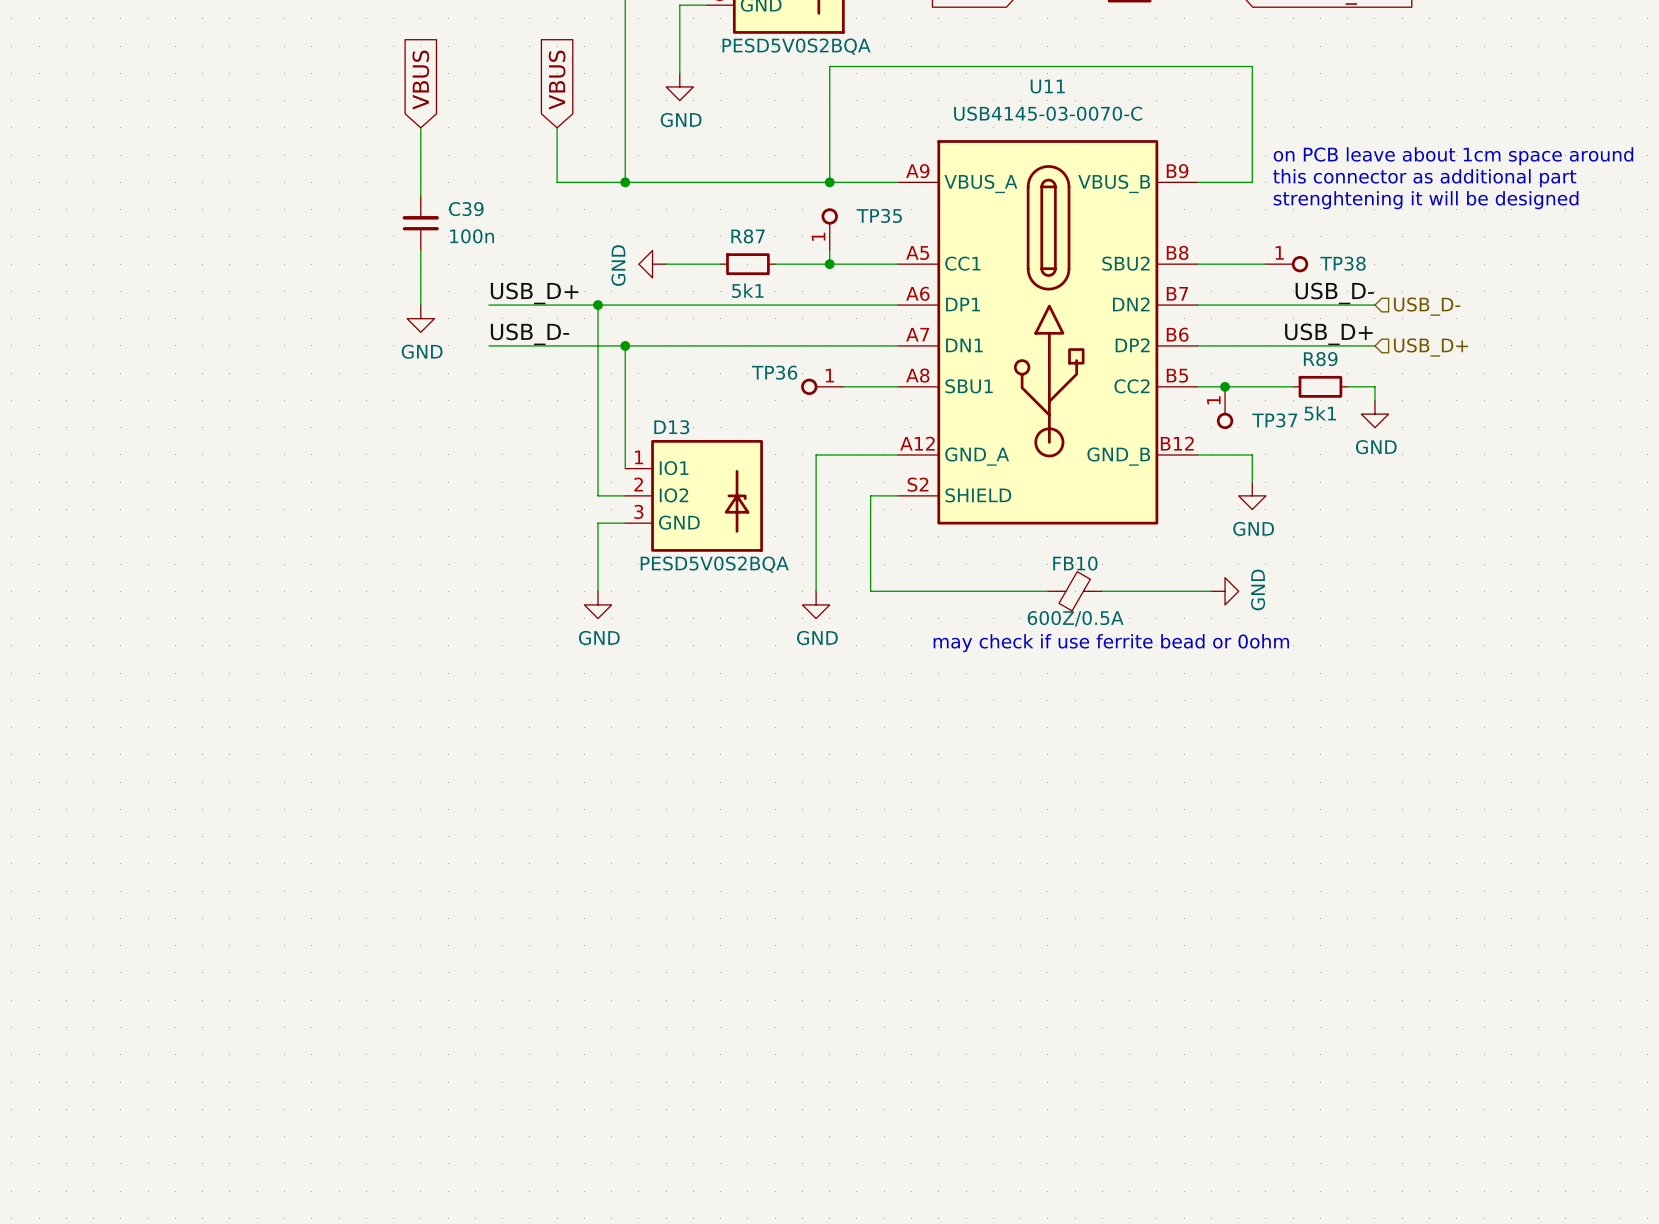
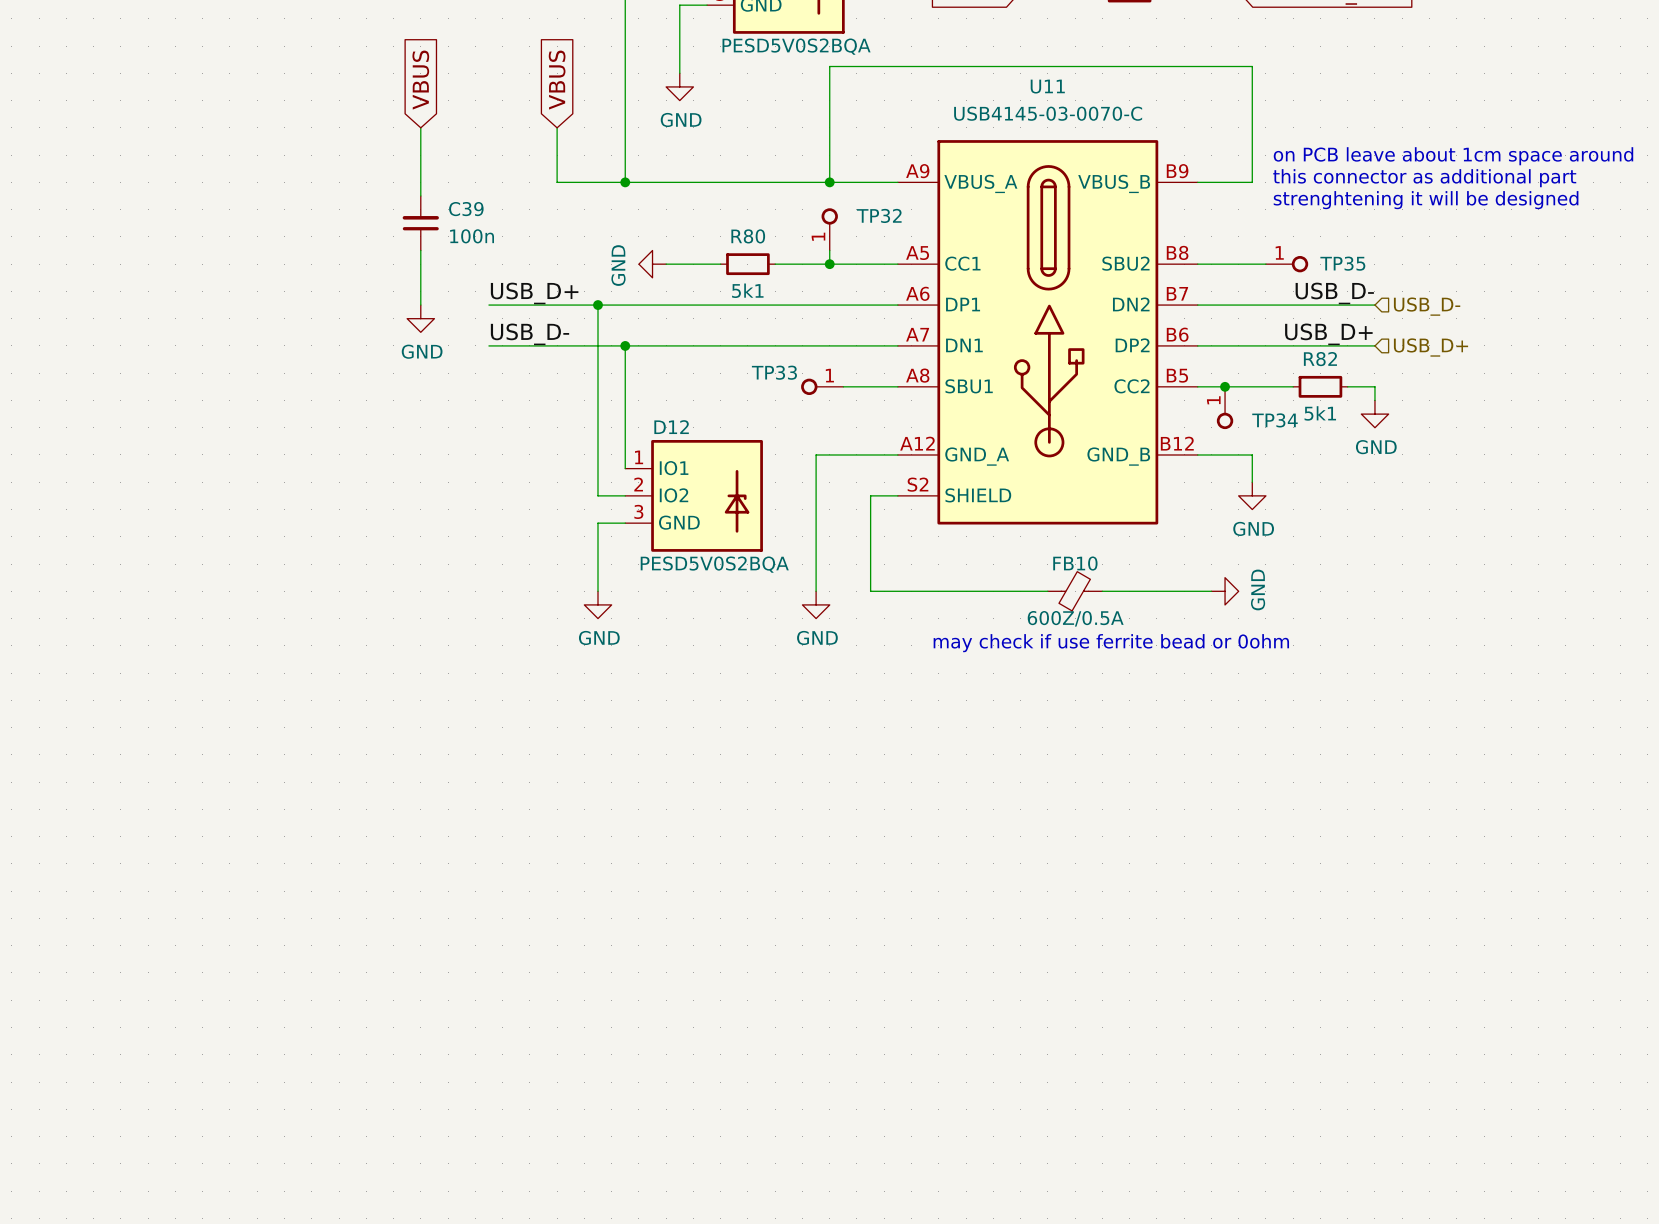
TP35 name: TP35 (879, 215) -> TP32 (879, 215)
R87 name: R87 (748, 236) -> R80 (748, 236)
TP38 name: TP38 (1343, 263) -> TP35 (1342, 263)
R89 name: R89 (1320, 359) -> R82 (1320, 359)
TP36 name: TP36 (774, 372) -> TP33 (774, 372)
TP37 name: TP37 (1274, 420) -> TP34 (1274, 420)
D13 name: D13 (671, 427) -> D12 (671, 427)

